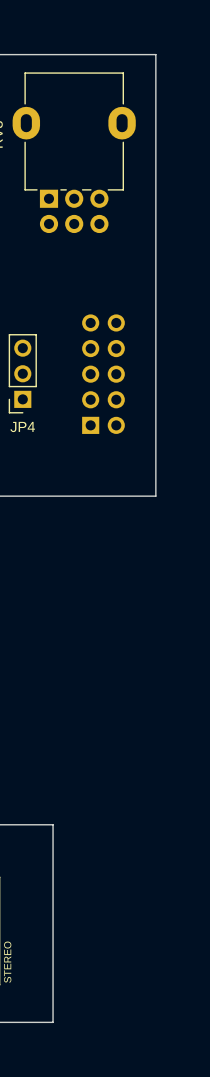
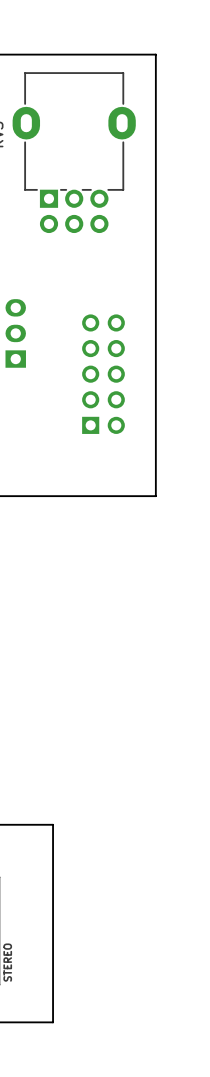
part: none -> (15, 333)
JP4: (22, 373) -> none

